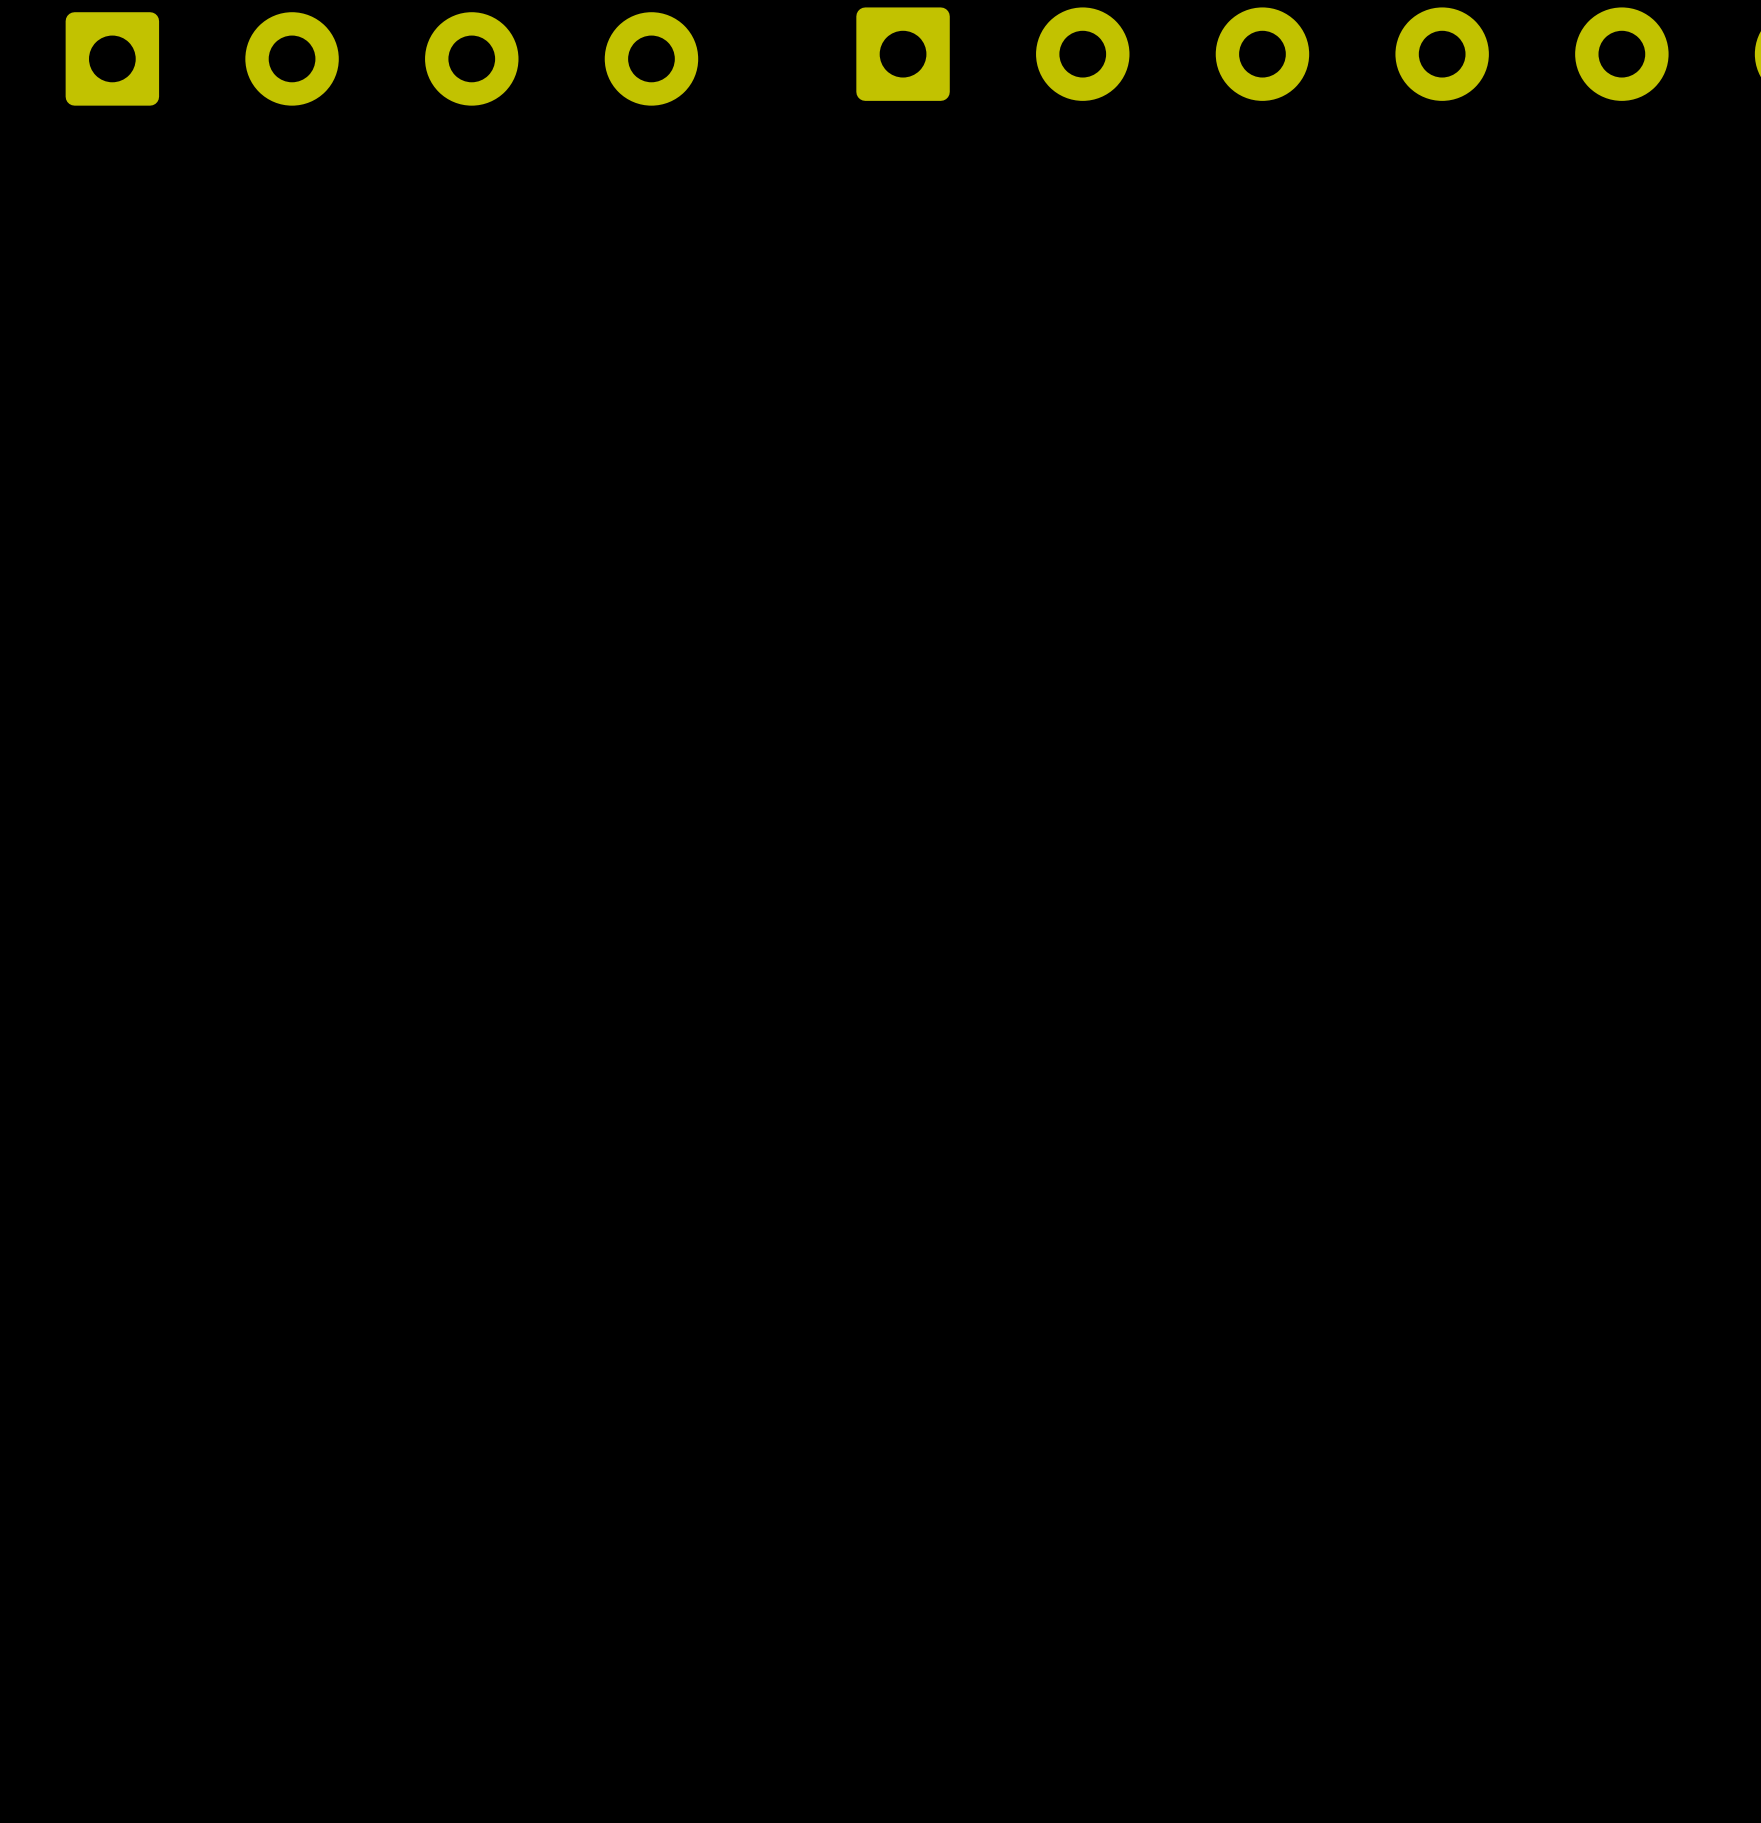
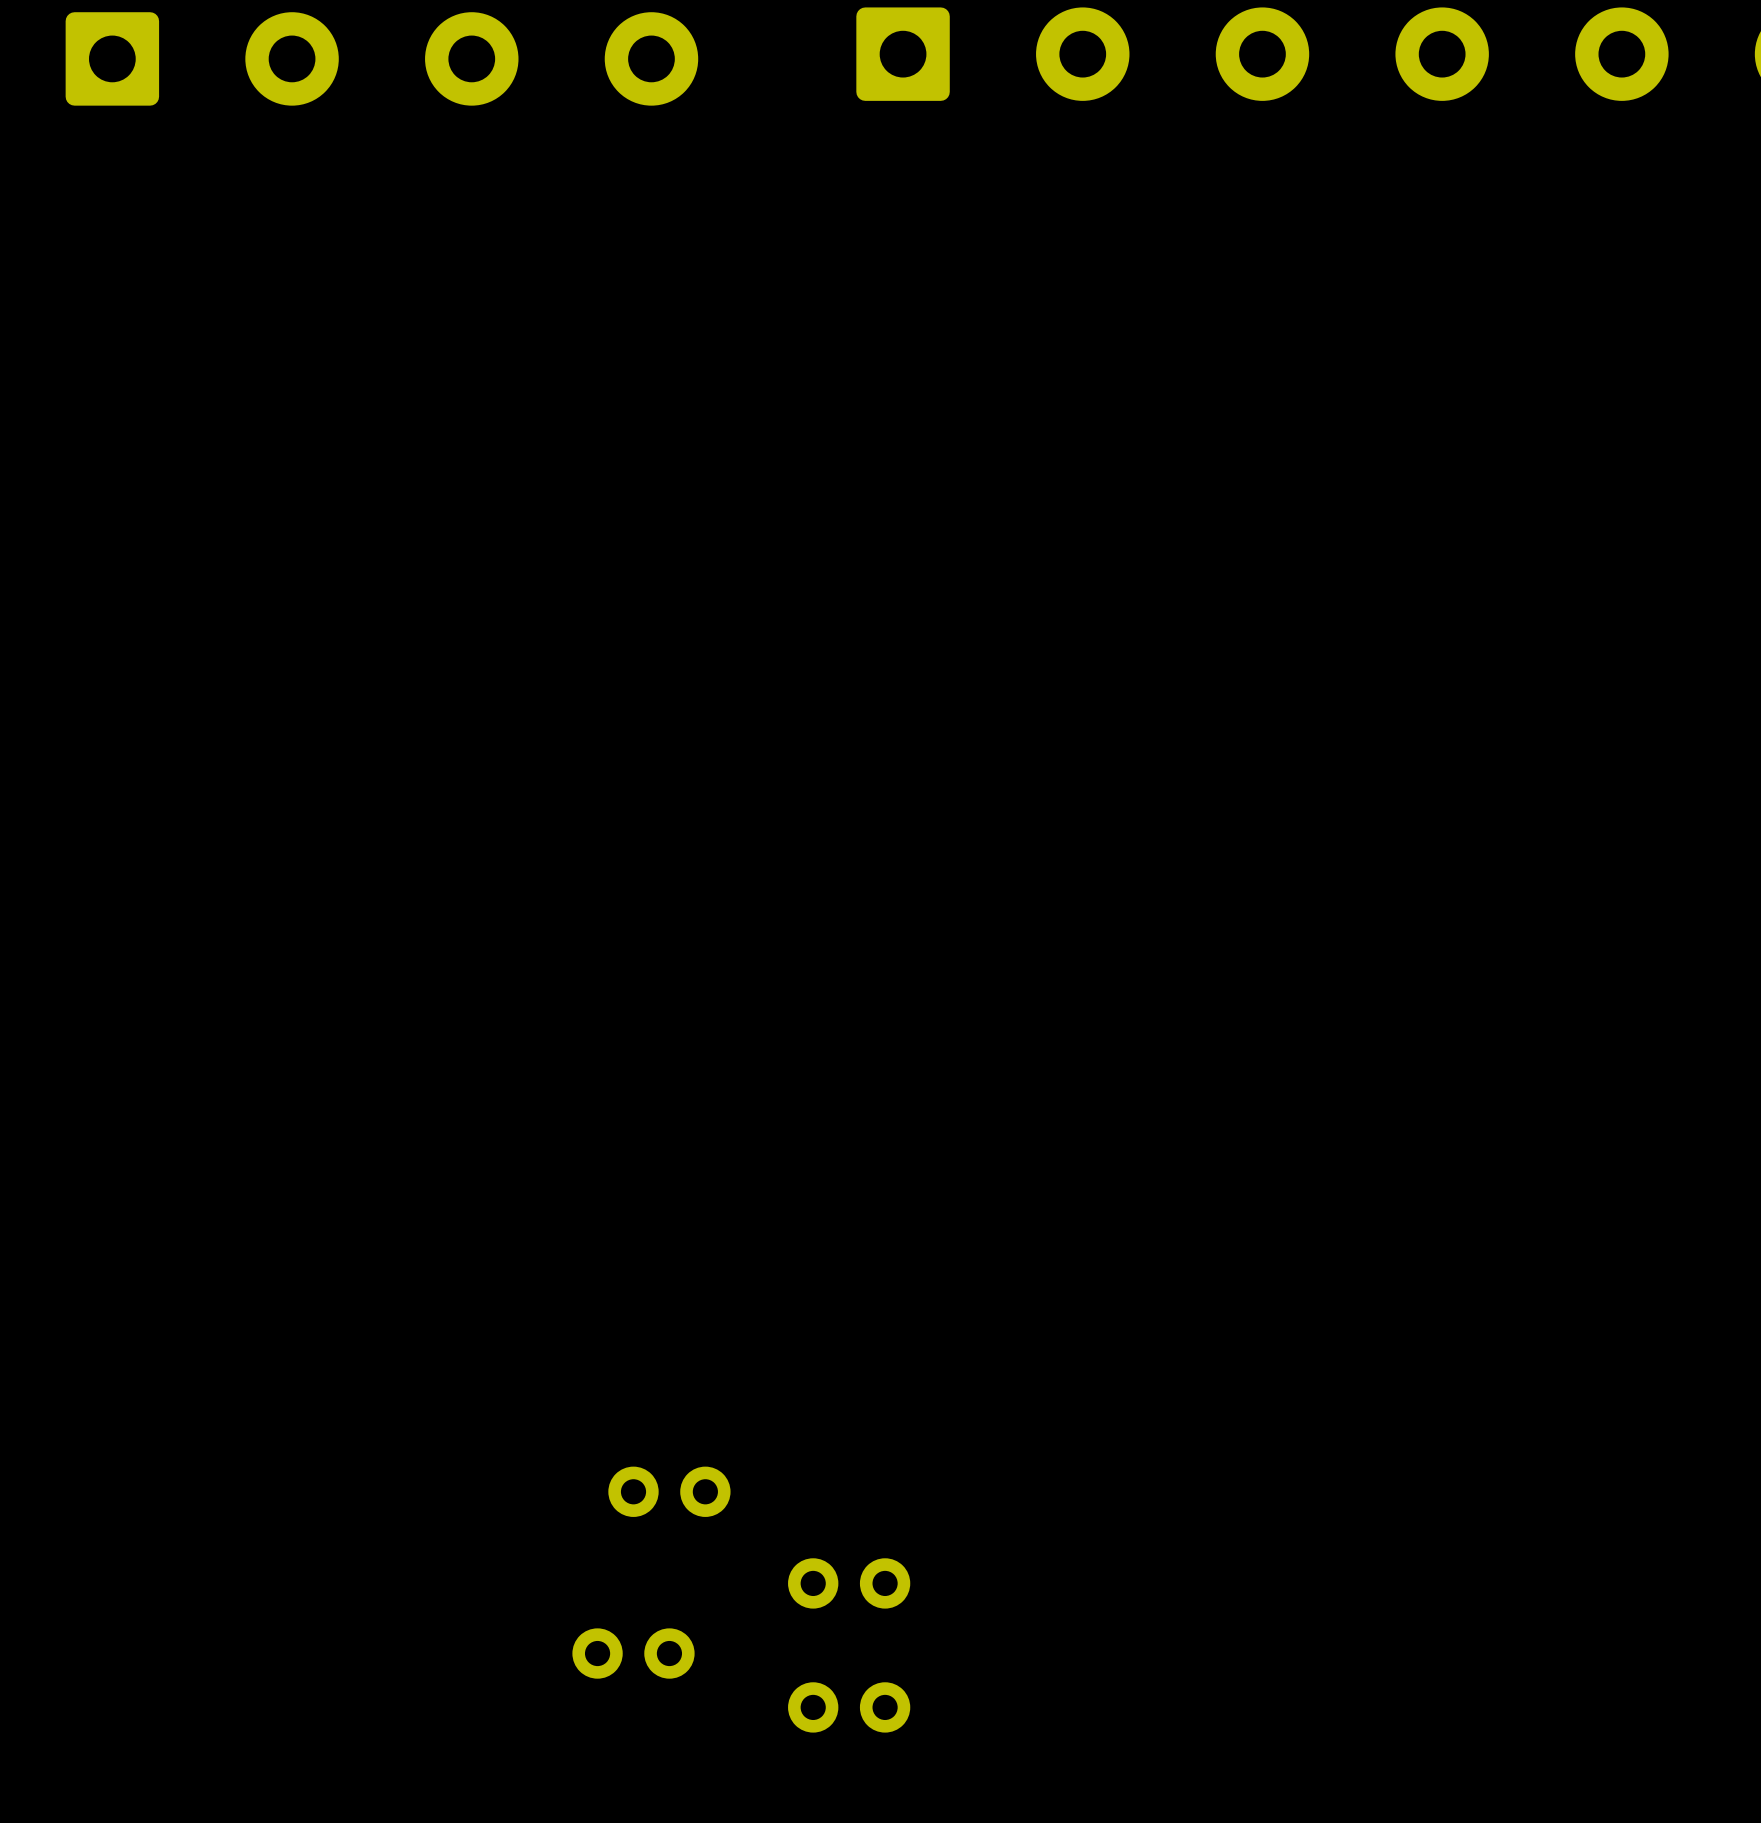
part: none -> (669, 1491)
part: none -> (849, 1583)
part: none -> (633, 1653)
part: none -> (849, 1707)

